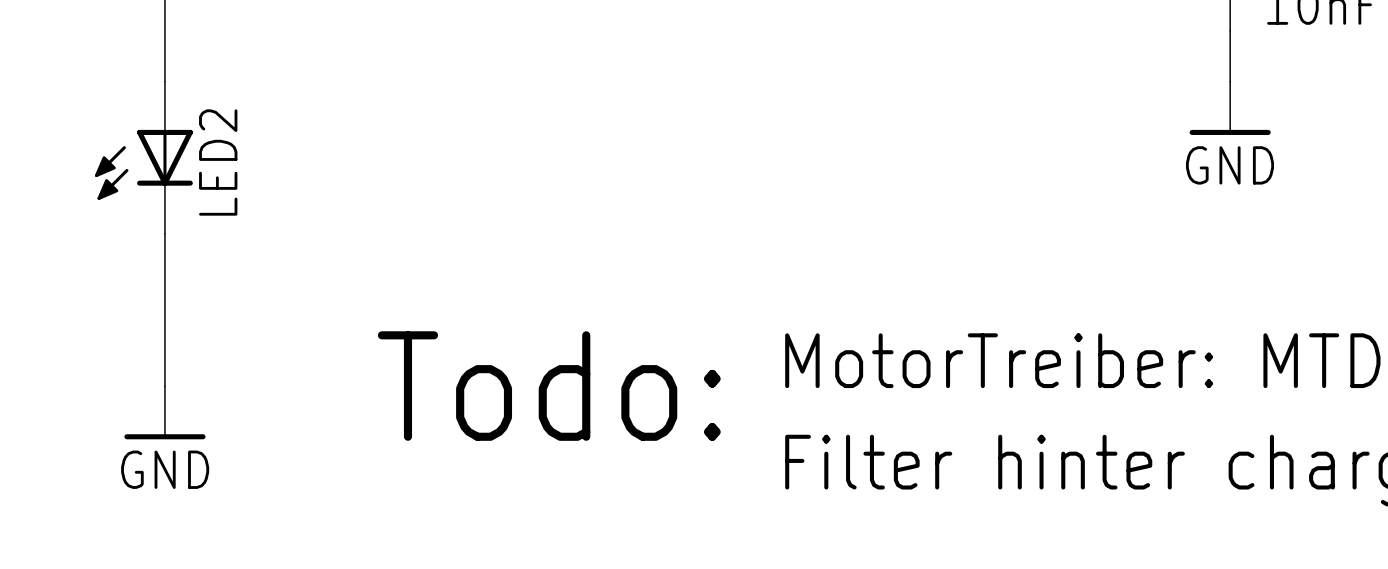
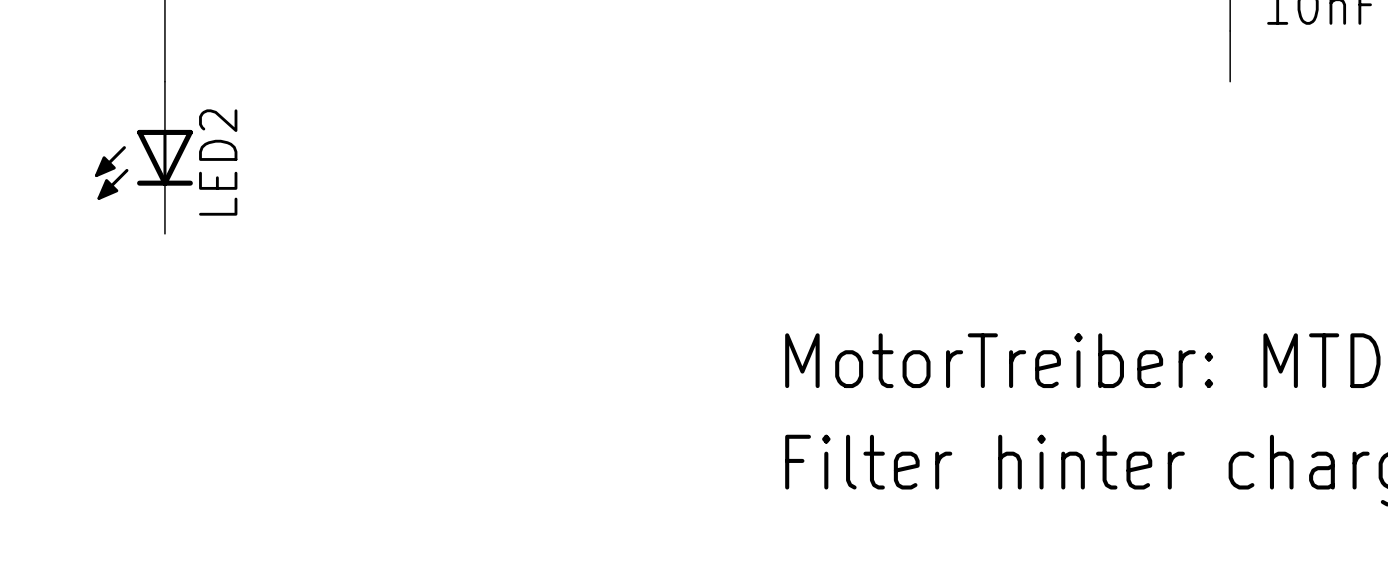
power symbol: GND (1230, 108) -> none
wire: (164, 233) (164, 386) -> none
text: Todo: (549, 386) -> none
power symbol: GND (164, 412) -> none

